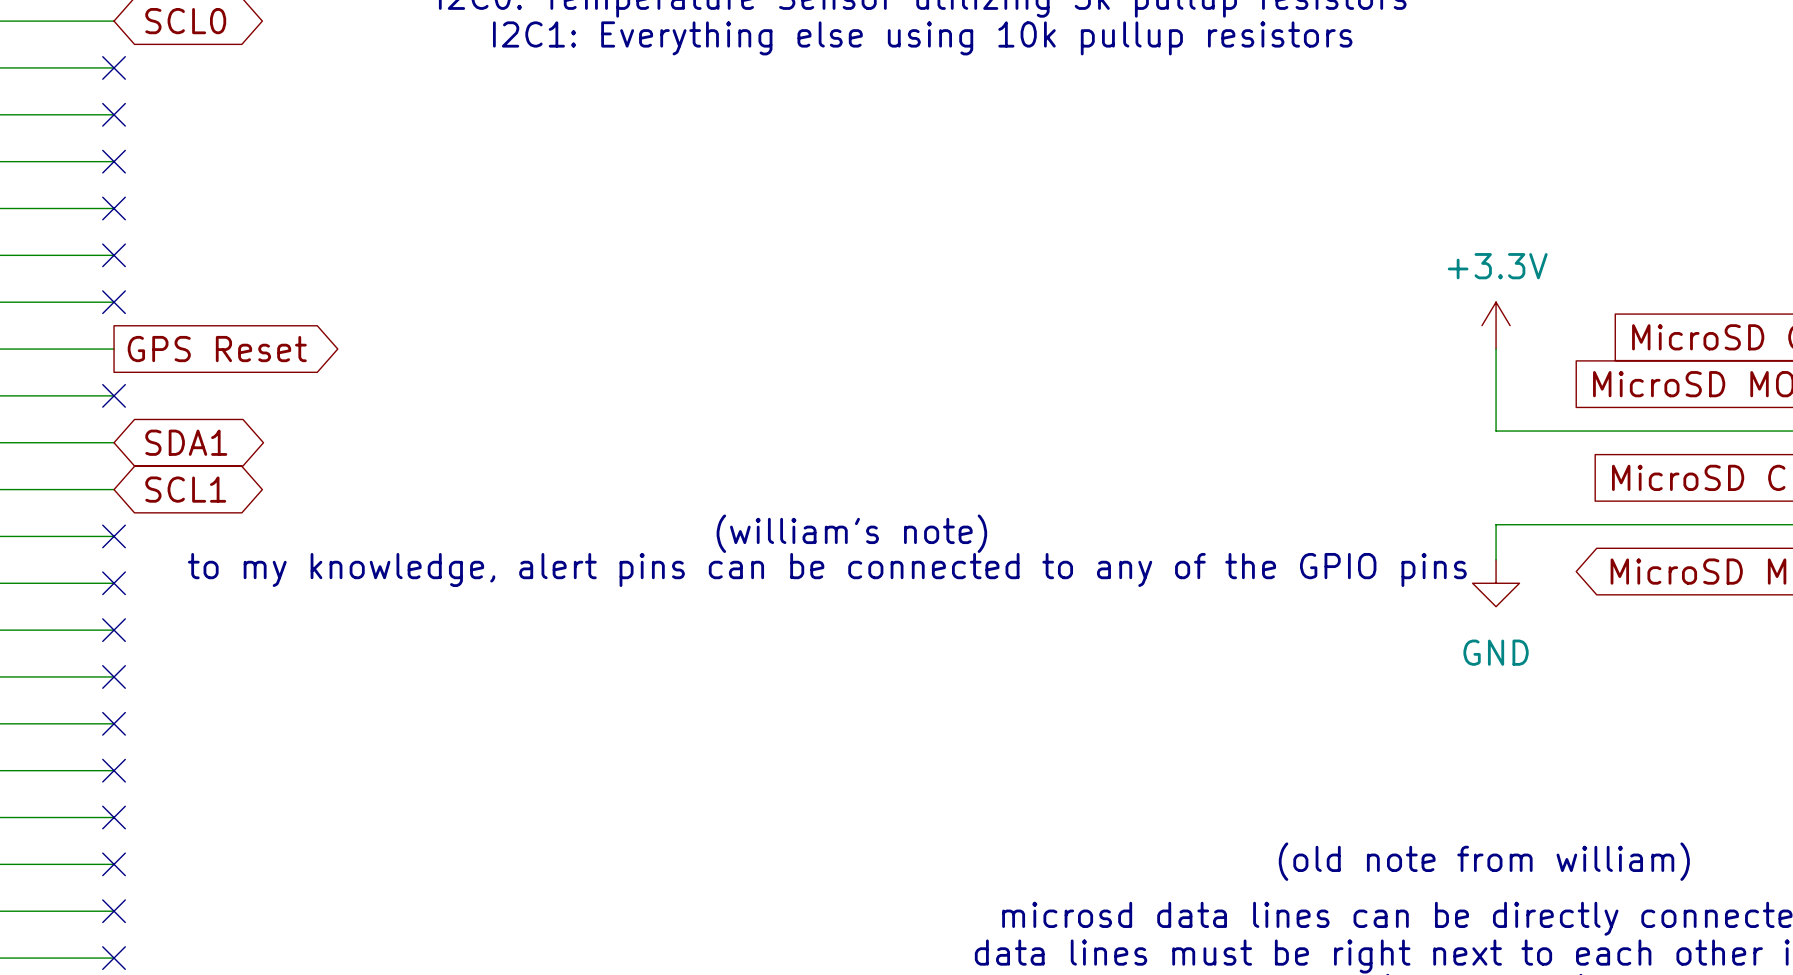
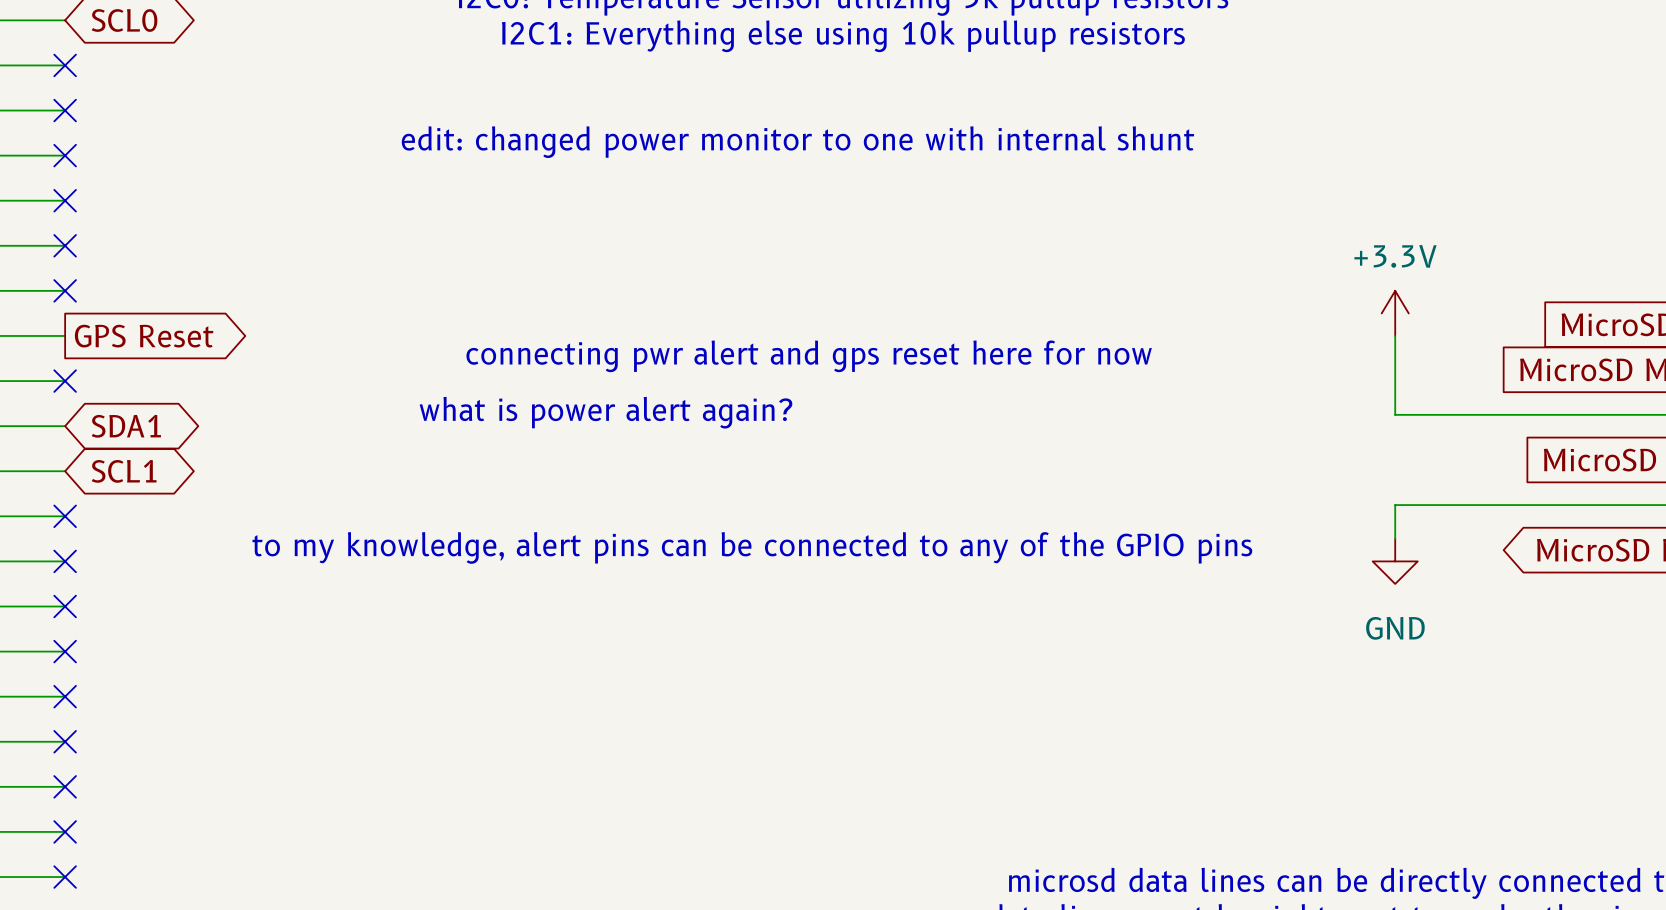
text: none -> edit: changed power monitor to one with internal shunt (797, 142)
text: none -> connecting pwr alert and gps reset here for now (809, 356)
text: none -> what is power alert again? (605, 412)
text: (william's note) (851, 533) -> none
text: (old note from william) (1484, 861) -> none

